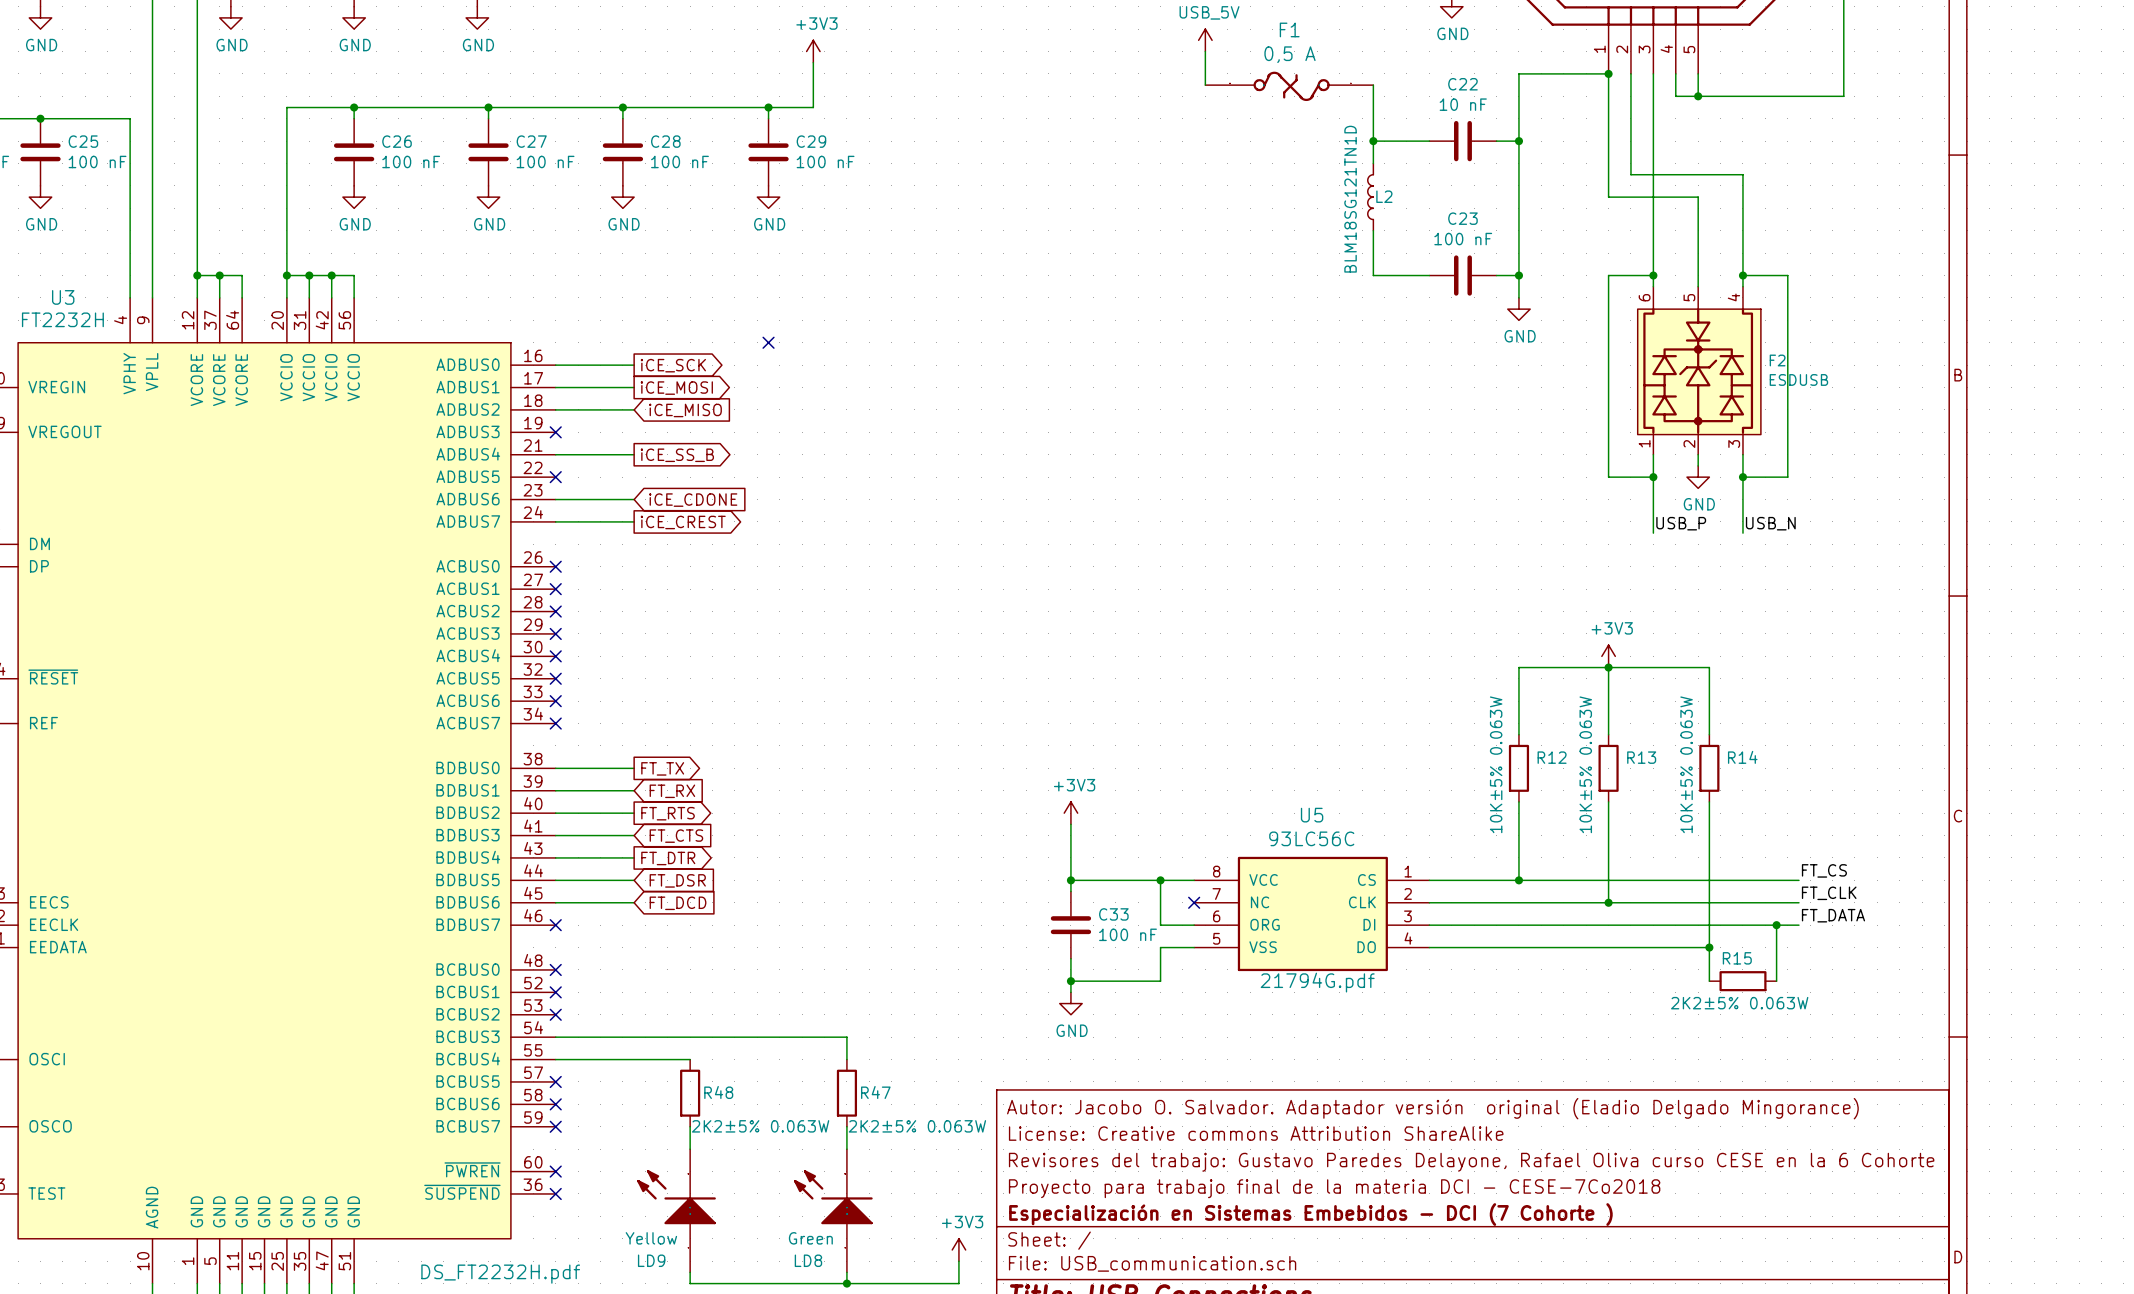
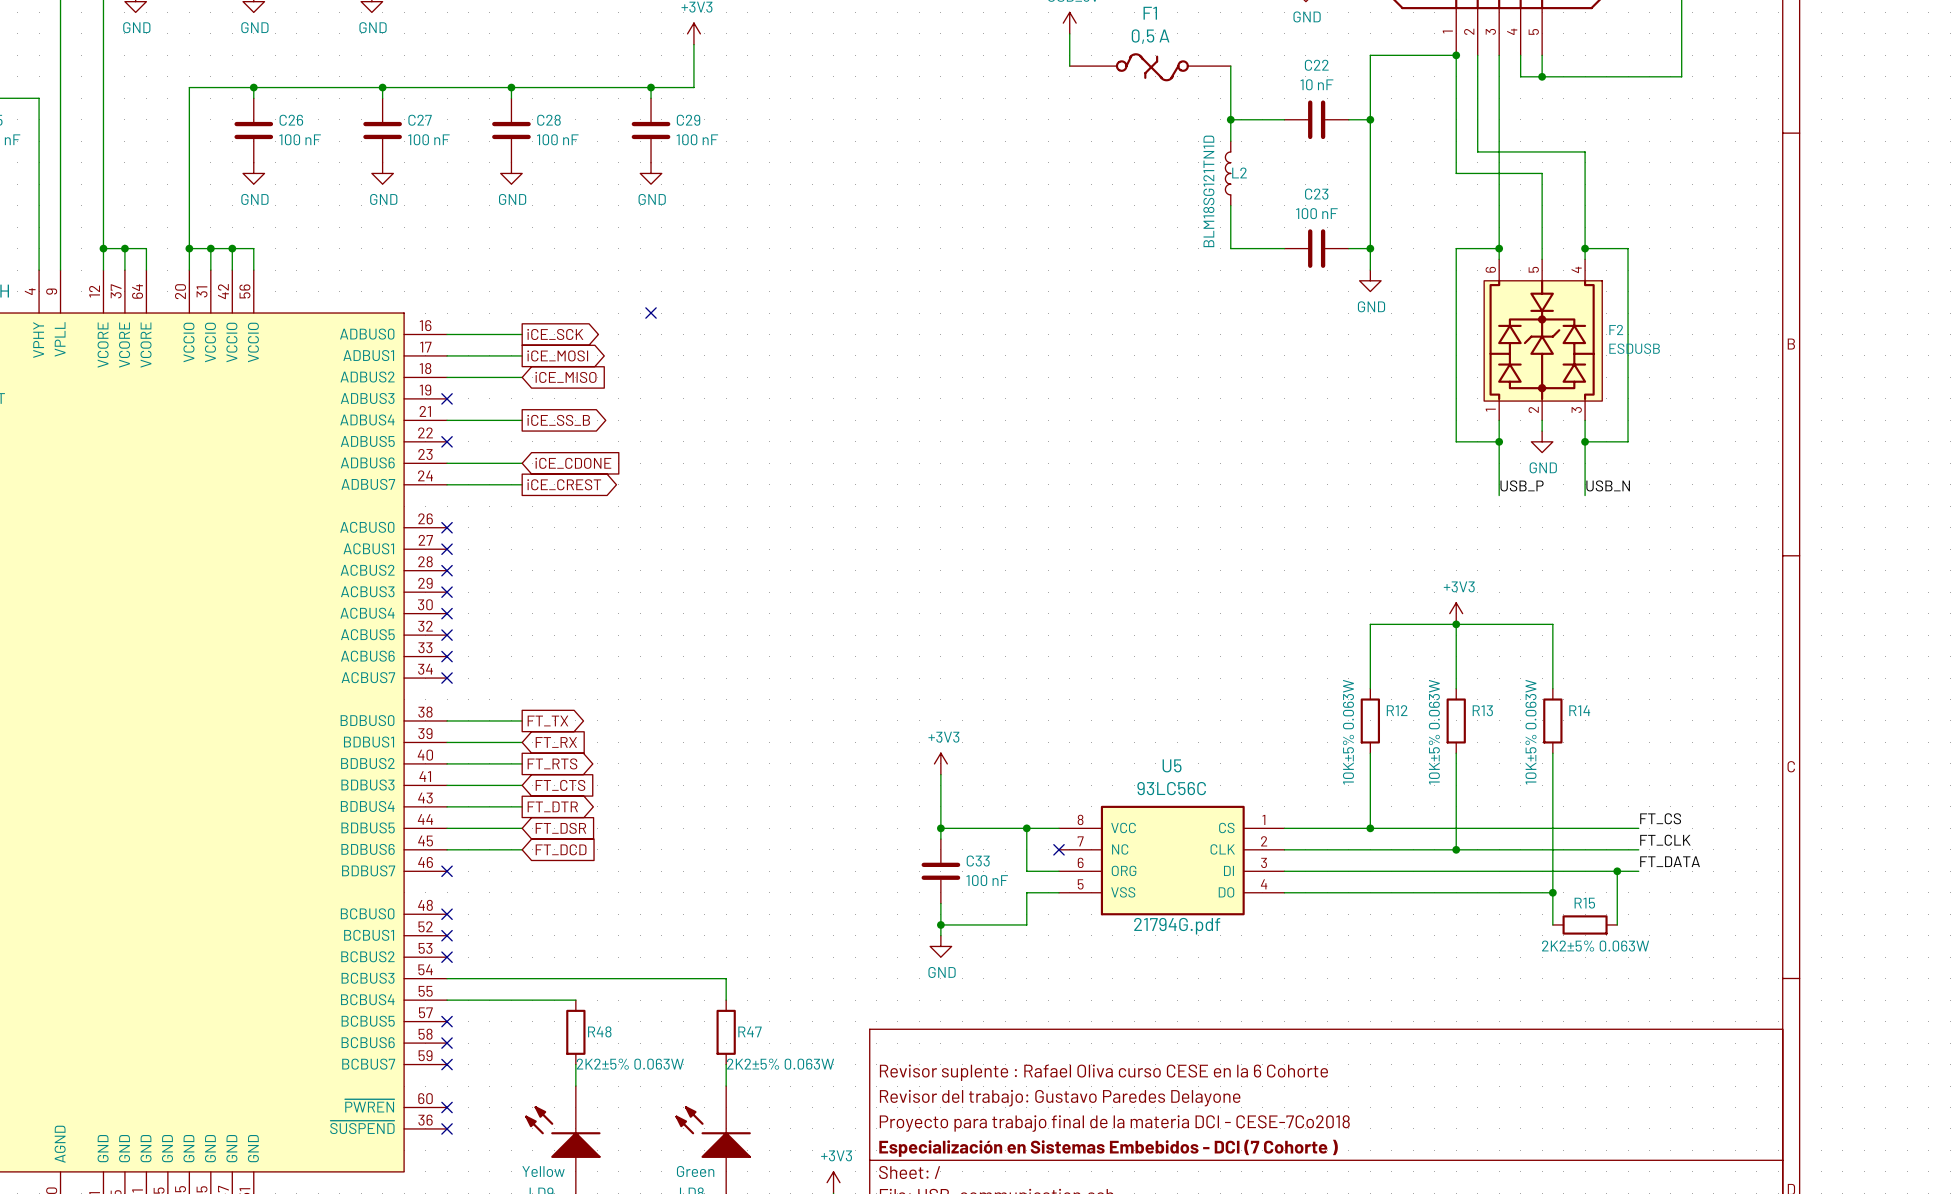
title block: Autor: Jacobo O. Salvador. Adaptador versión original (Eladio Delgado Mingorance) (1432, 1108) -> none
title block: License: Creative commons Attribution ShareAlike (1256, 1133) -> Revisor suplente : Rafael Oliva curso CESE en la 6 Cohorte (1103, 1072)
title block: Revisores del trabajo: Gustavo Paredes Delayone, Rafael Oliva curso CESE en la 6 Cohorte (1471, 1162) -> Revisor del trabajo: Gustavo Paredes Delayone (1060, 1098)

